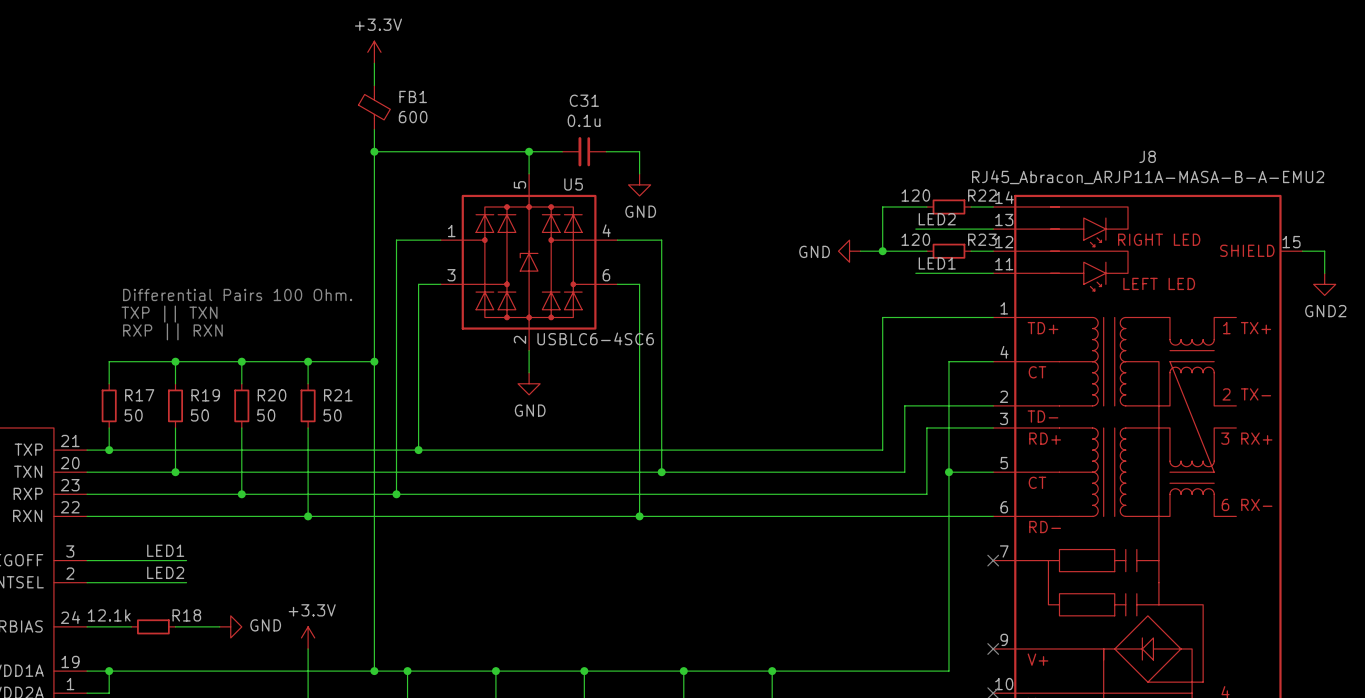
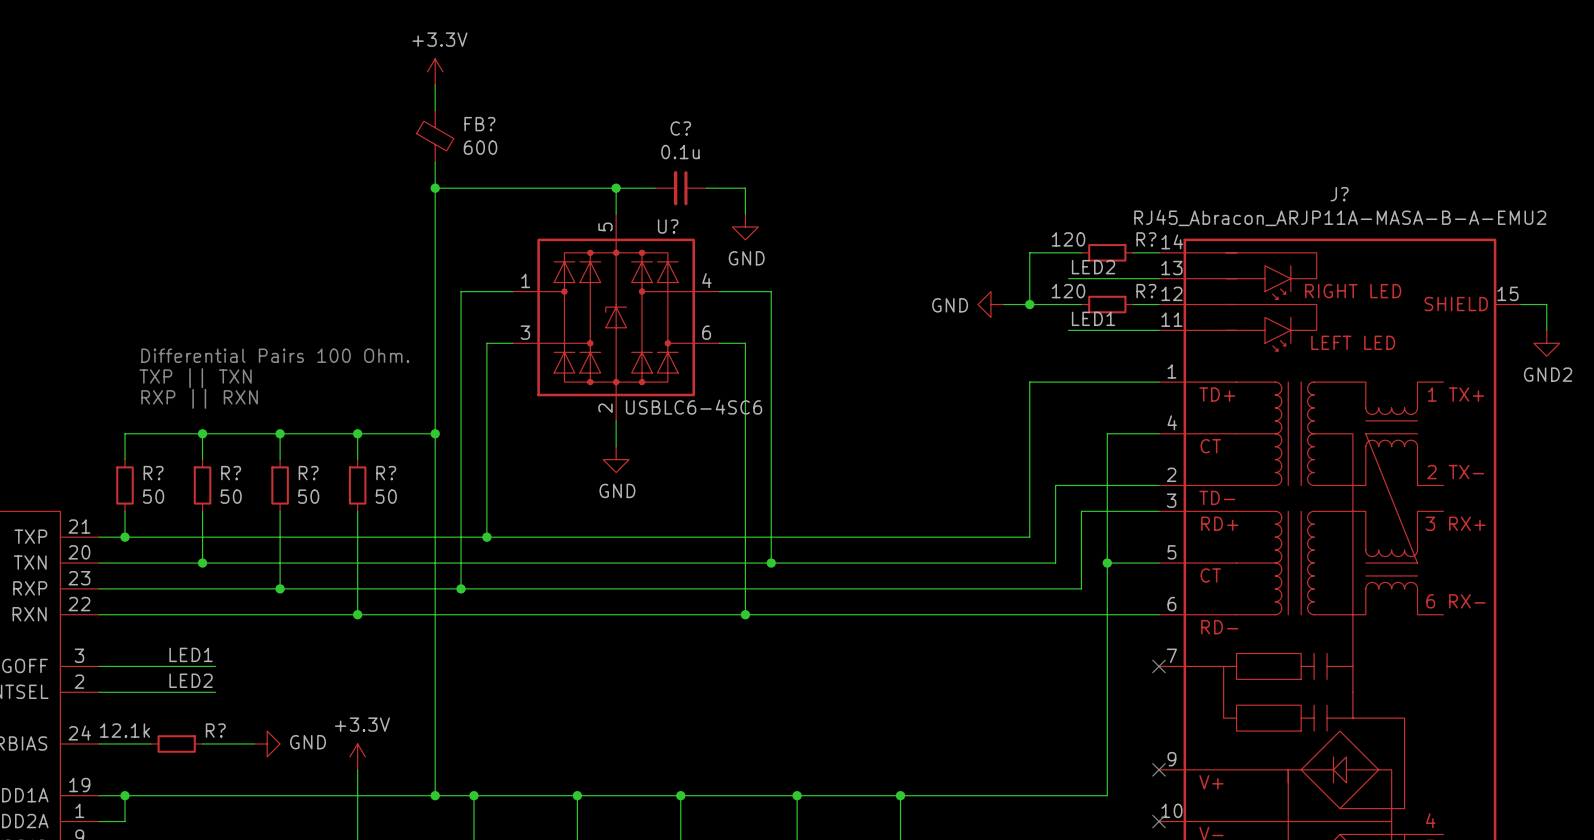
FB1 name: FB1 (413, 96) -> FB? (479, 124)
C31 name: C31 (584, 100) -> C? (680, 128)
J8 name: J8 (1147, 156) -> J? (1339, 194)
U5 name: U5 (573, 184) -> U? (668, 226)
R22 name: R22 (982, 195) -> R? (1146, 239)
R23 name: R23 (982, 239) -> R? (1146, 291)
R17 name: R17 (139, 395) -> R? (153, 473)
R19 name: R19 (205, 395) -> R? (231, 473)
R20 name: R20 (272, 395) -> R? (308, 473)
R21 name: R21 (338, 395) -> R? (386, 473)
R18 name: R18 (186, 615) -> R? (215, 730)

